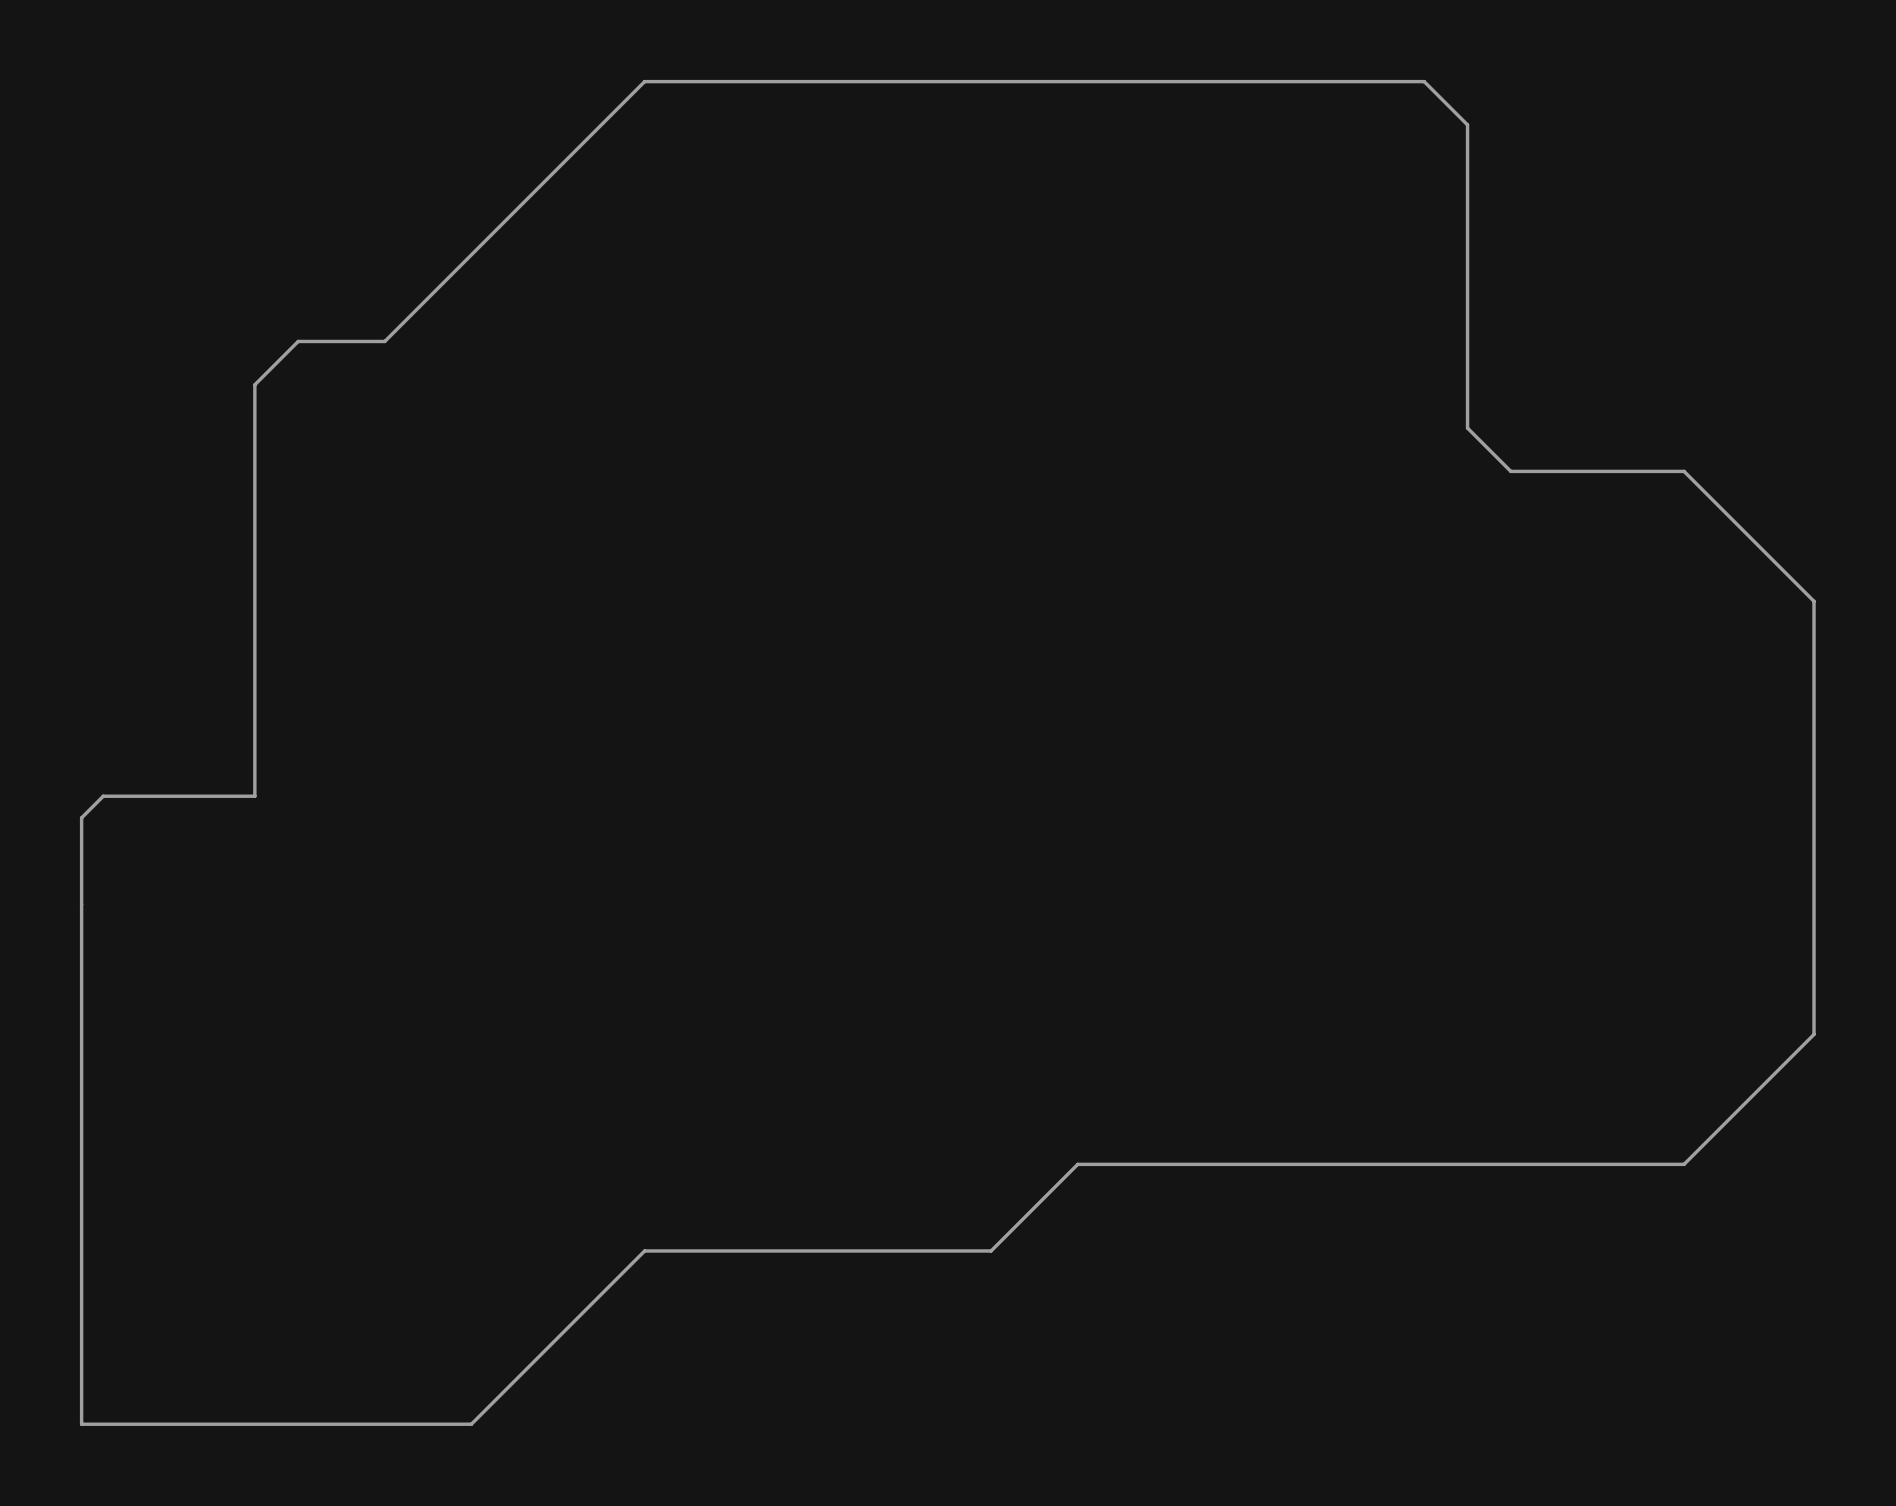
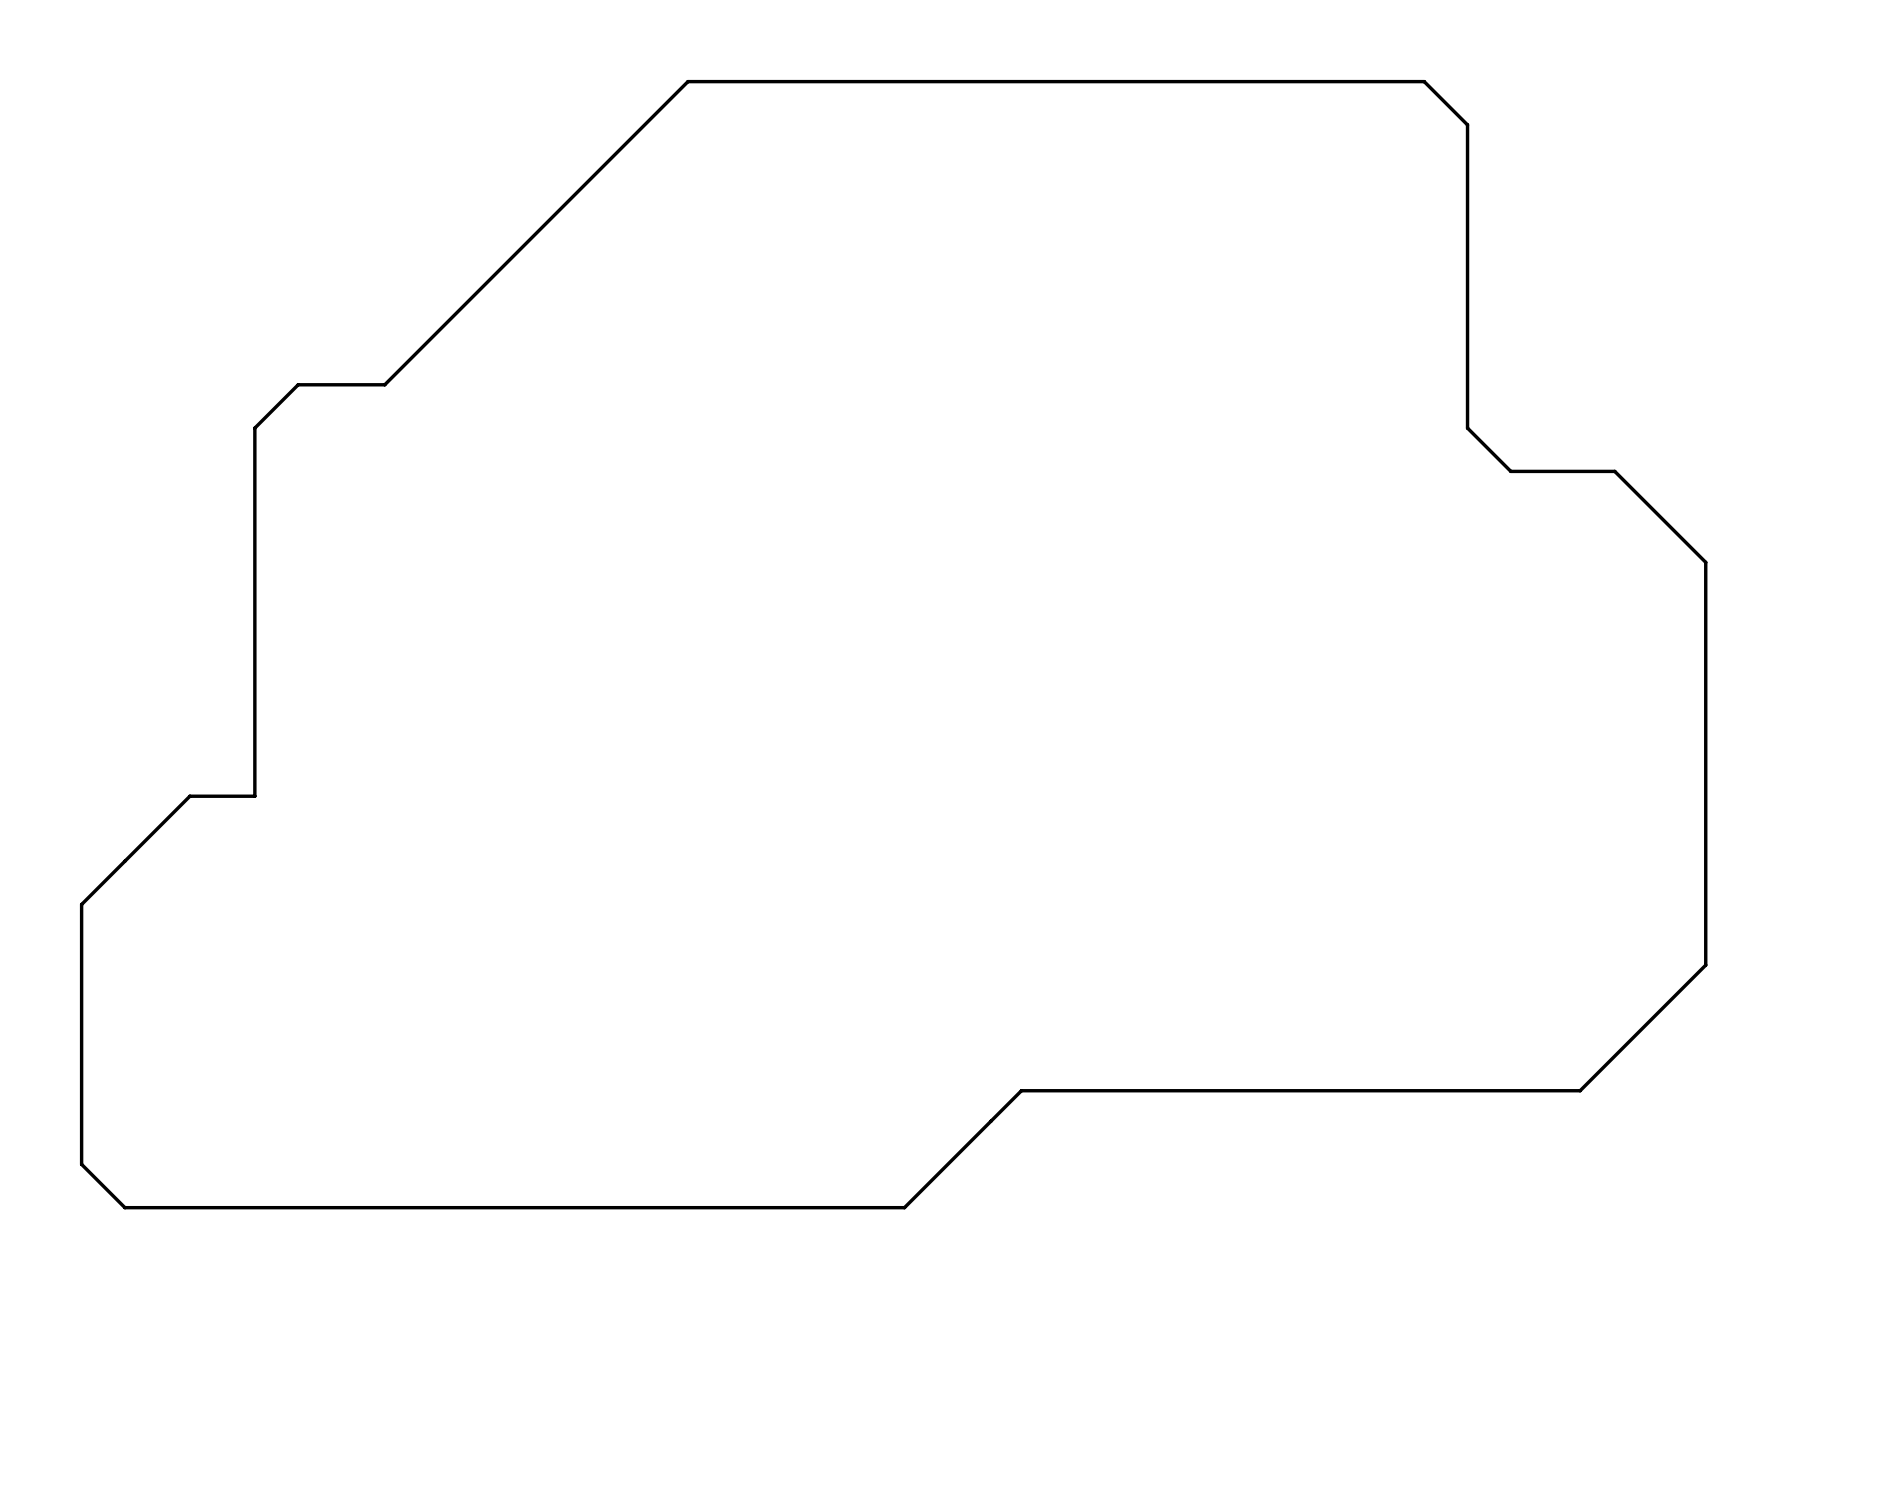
board edge: (687, 81) (644, 81) (384, 341) (298, 341) (254, 384) (254, 428) -> (687, 81) (384, 384) (298, 384) (254, 428)
board edge: (1614, 471) (1684, 471) (1814, 601) (1814, 1034) (1684, 1164) (1077, 1164) (991, 1250) (644, 1250) (471, 1424) (81, 1424) (81, 1164) -> (1614, 471) (1705, 562) (1705, 965) (1580, 1090) (1021, 1090) (904, 1207) (124, 1207) (81, 1164)
board edge: (189, 796) (103, 796) (81, 817) (81, 904) -> (189, 796) (81, 904)

